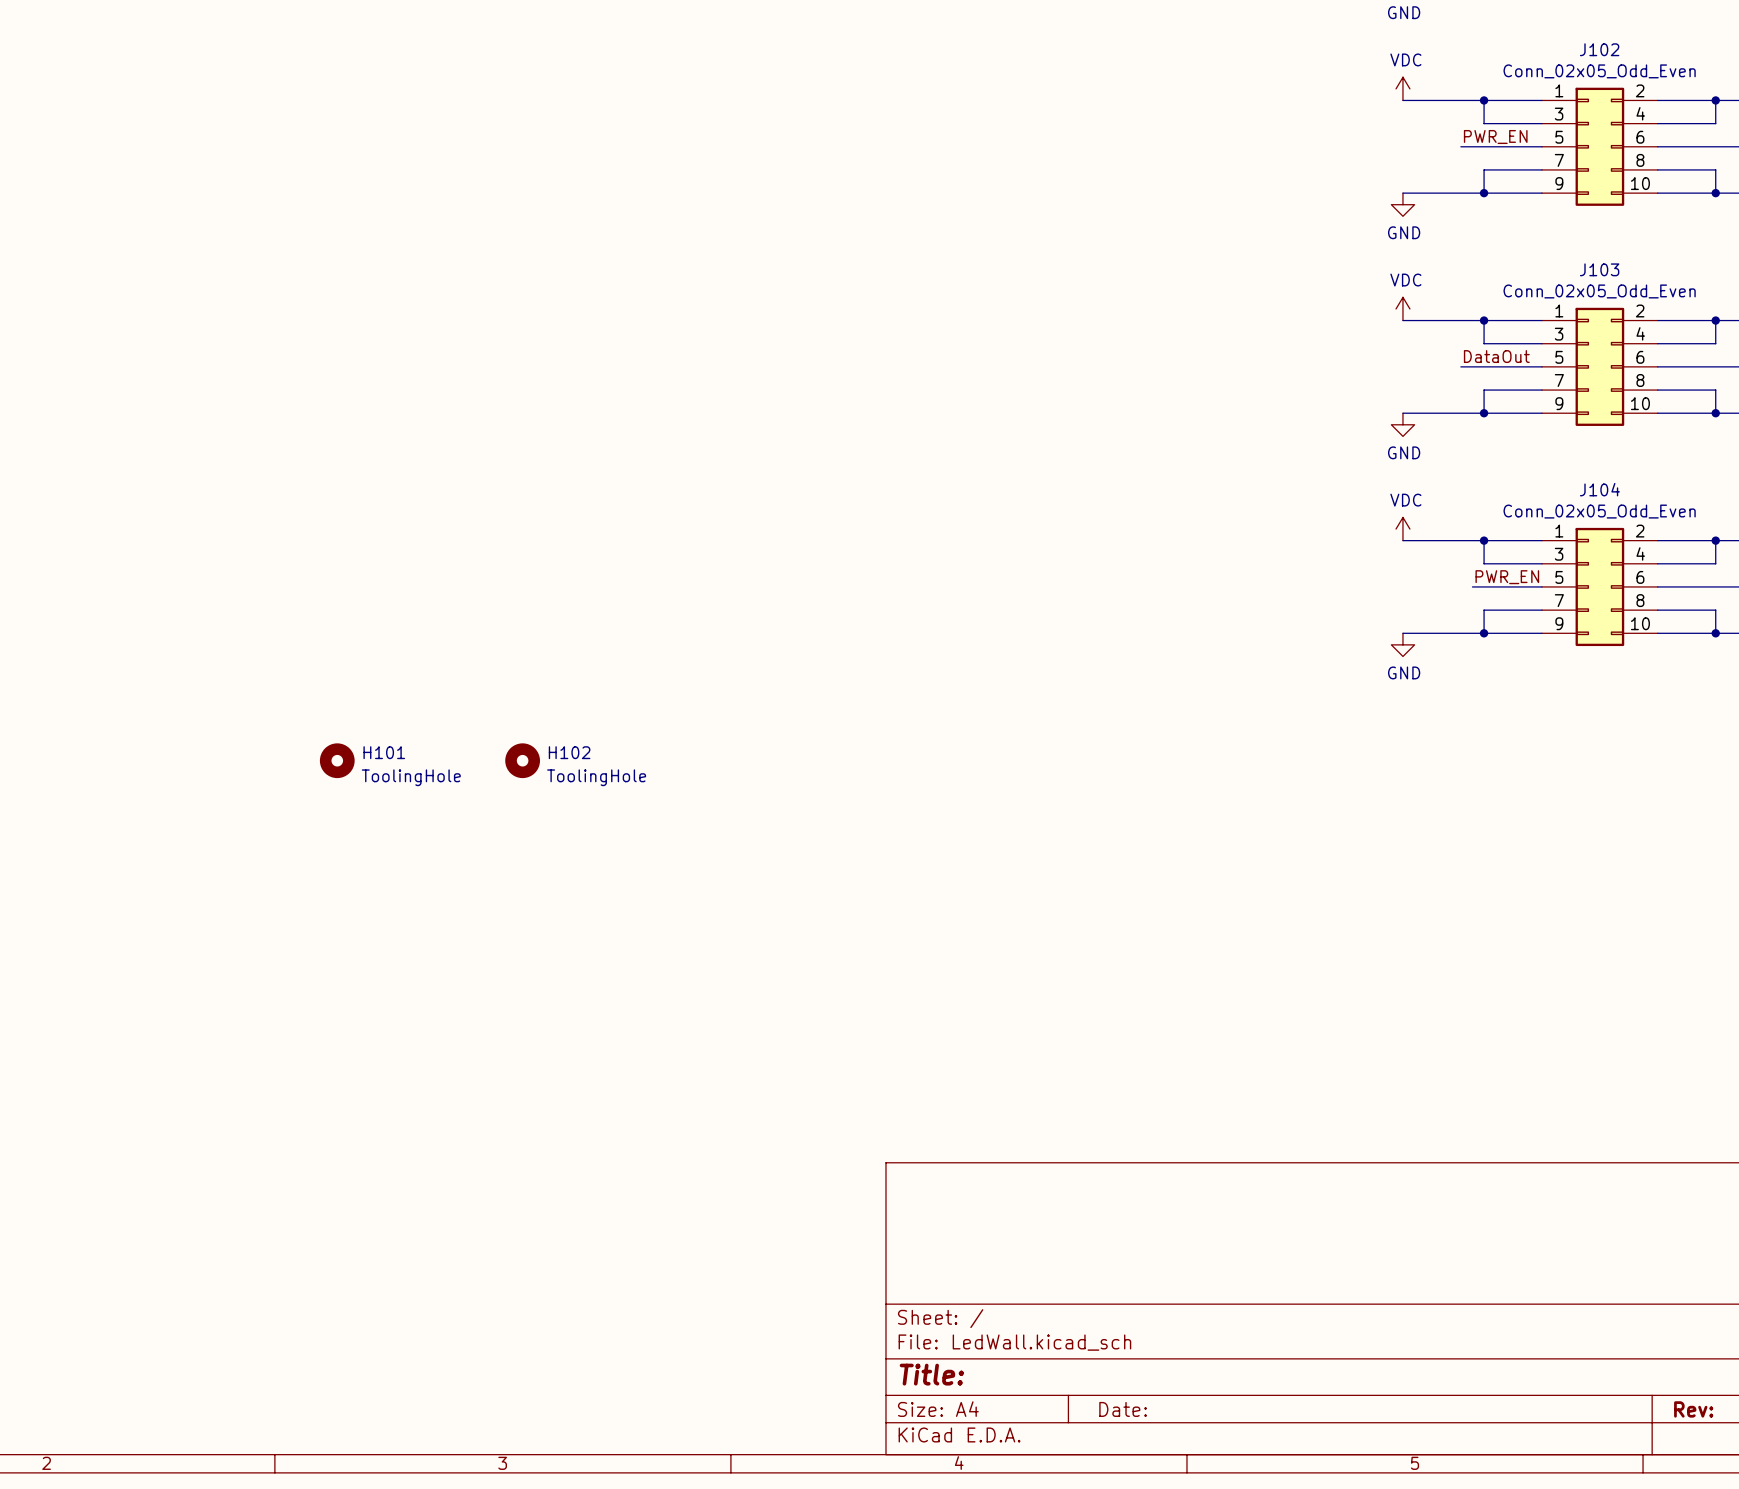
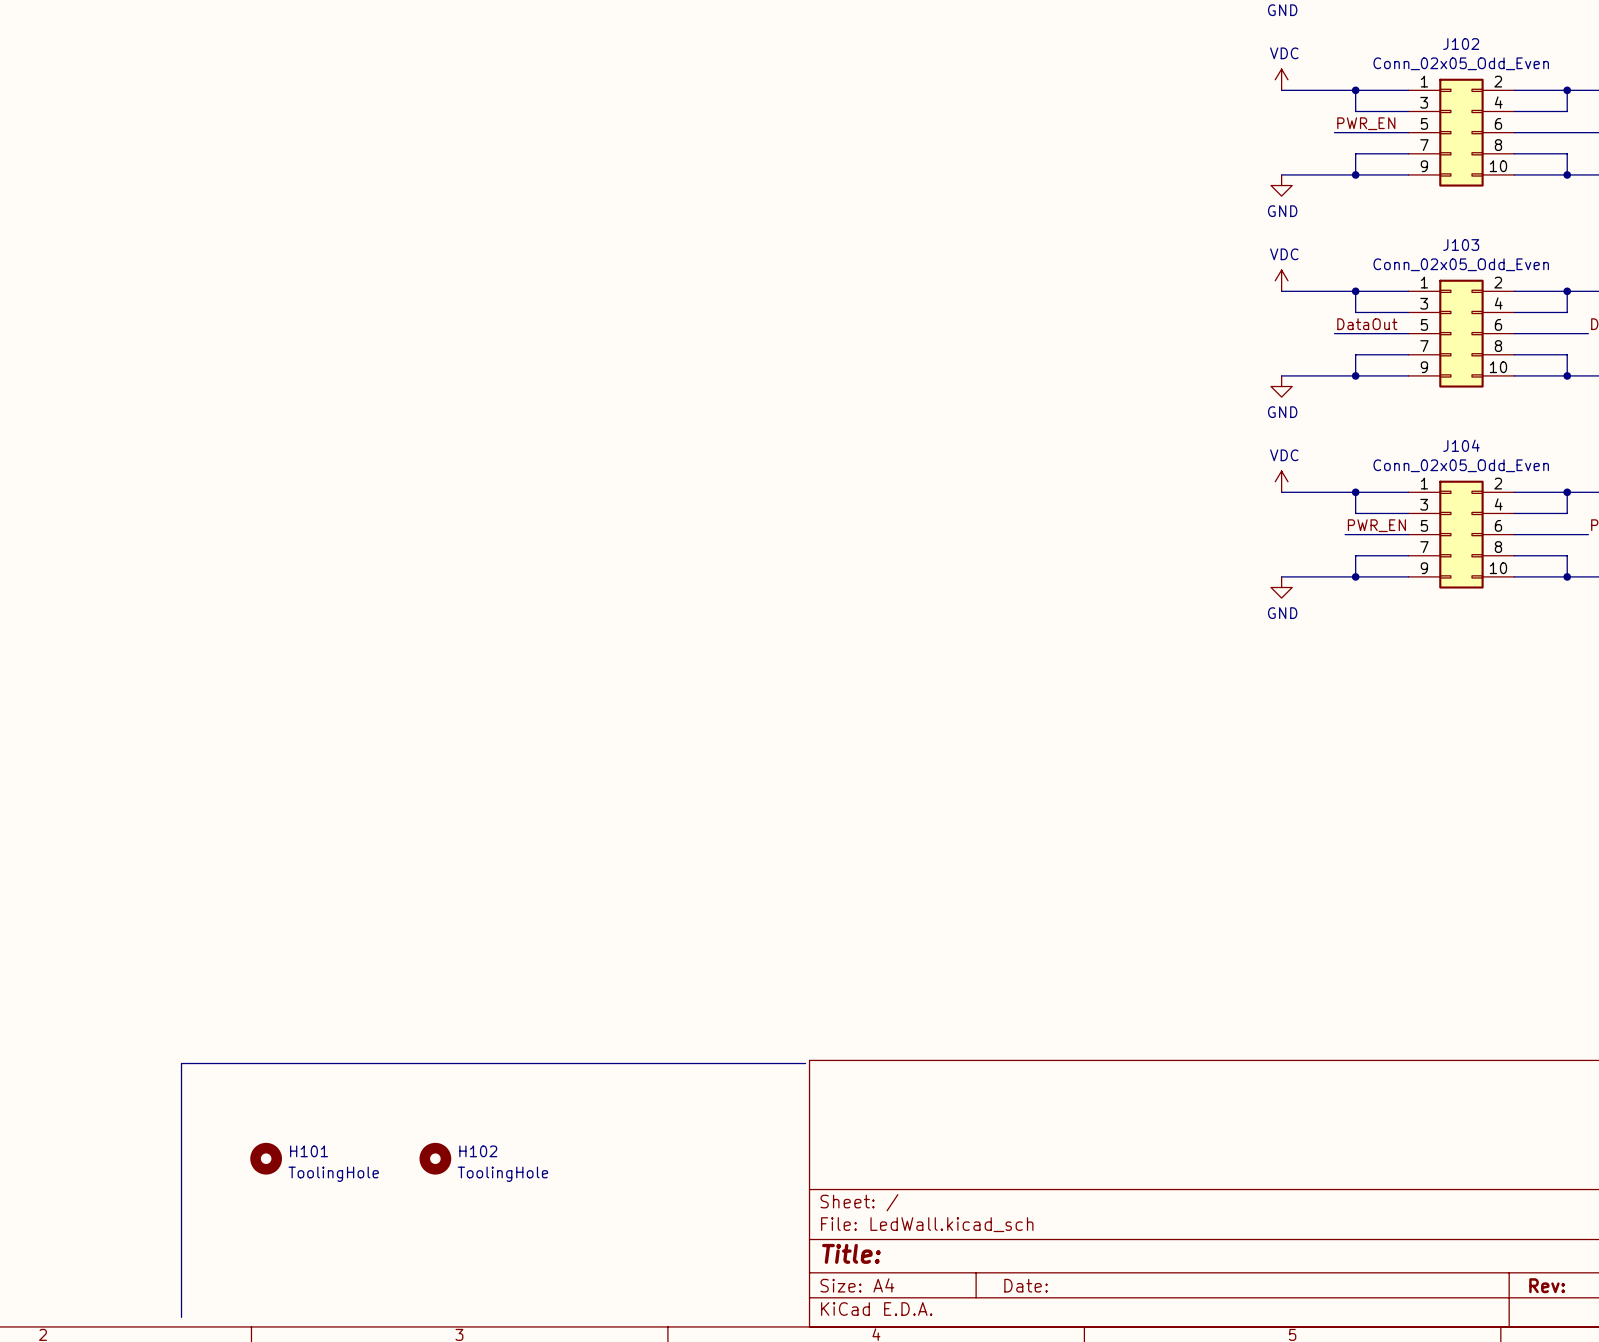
H101 position: (337, 760) -> (266, 1158)
H102 position: (522, 760) -> (435, 1158)
line: none -> (805, 1063) (181, 1063) (181, 1317)

